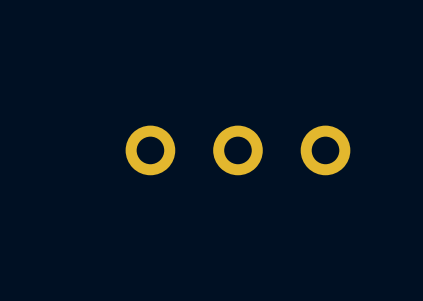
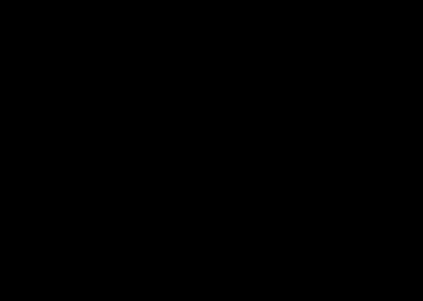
part: (237, 150) -> none

